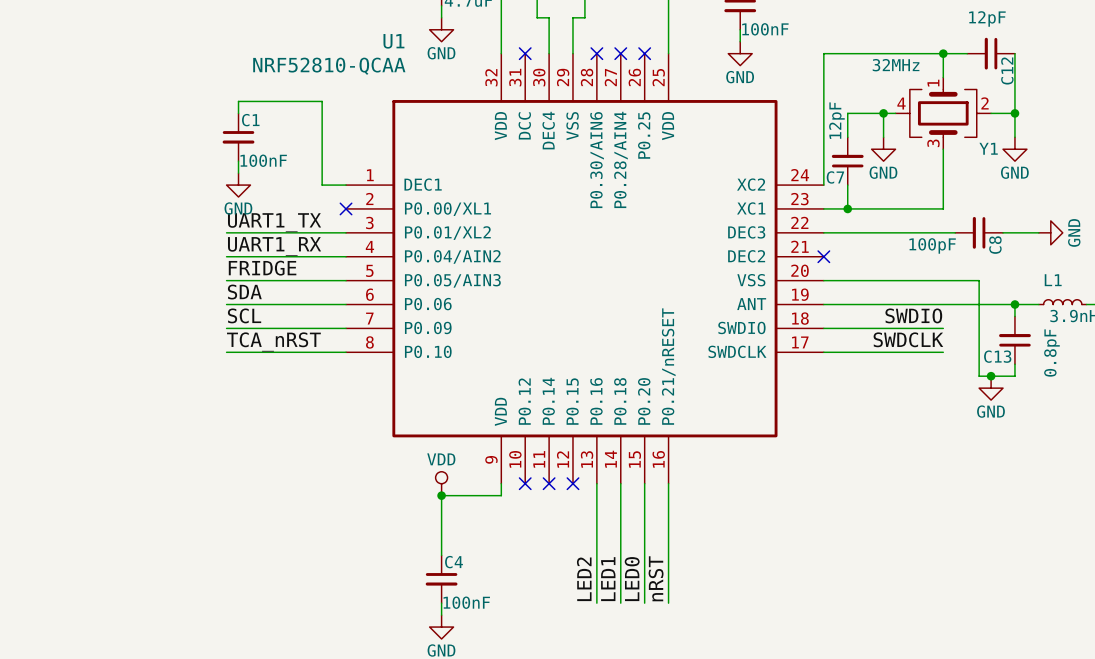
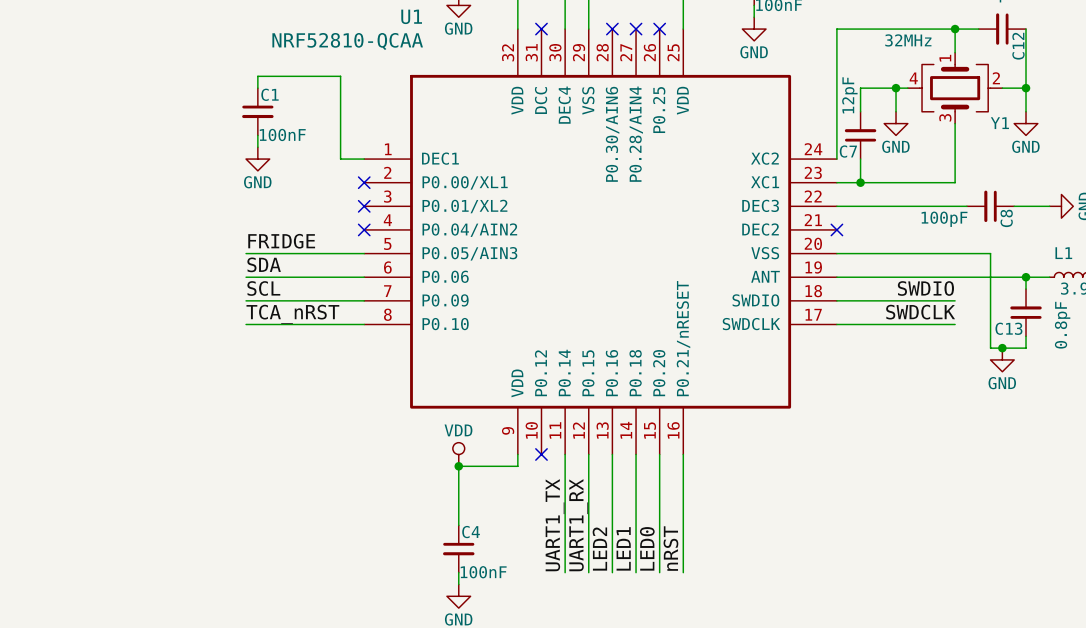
label: UART1_TX (274, 222) -> none
wire: (226, 232) (346, 232) -> none
no-connect mark: none -> (364, 206)
label: UART1_RX (274, 246) -> none
wire: (226, 256) (346, 256) -> none
no-connect mark: none -> (364, 229)
wire: none -> (565, 454) (565, 572)
no-connect mark: (549, 483) -> none
wire: none -> (588, 454) (588, 572)
no-connect mark: (572, 483) -> none
label: none -> UART1_TX (555, 525)
label: none -> UART1_RX (578, 525)

